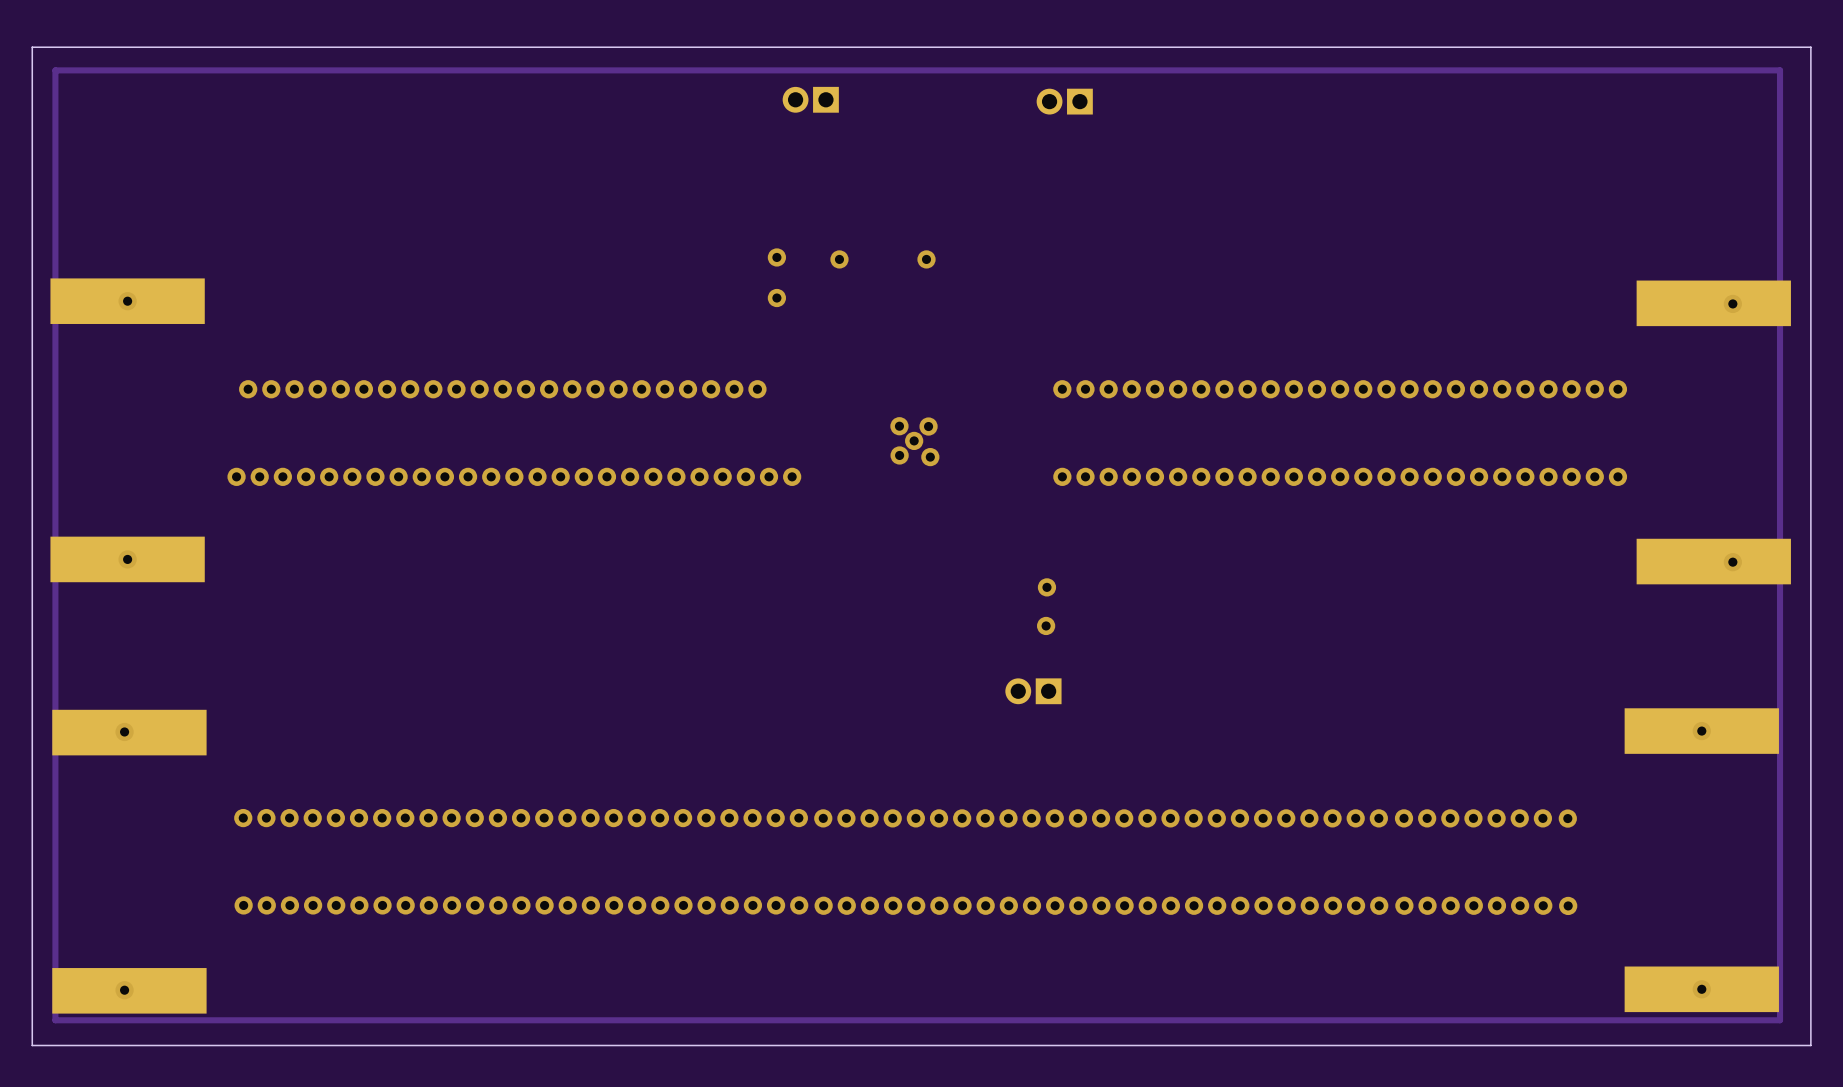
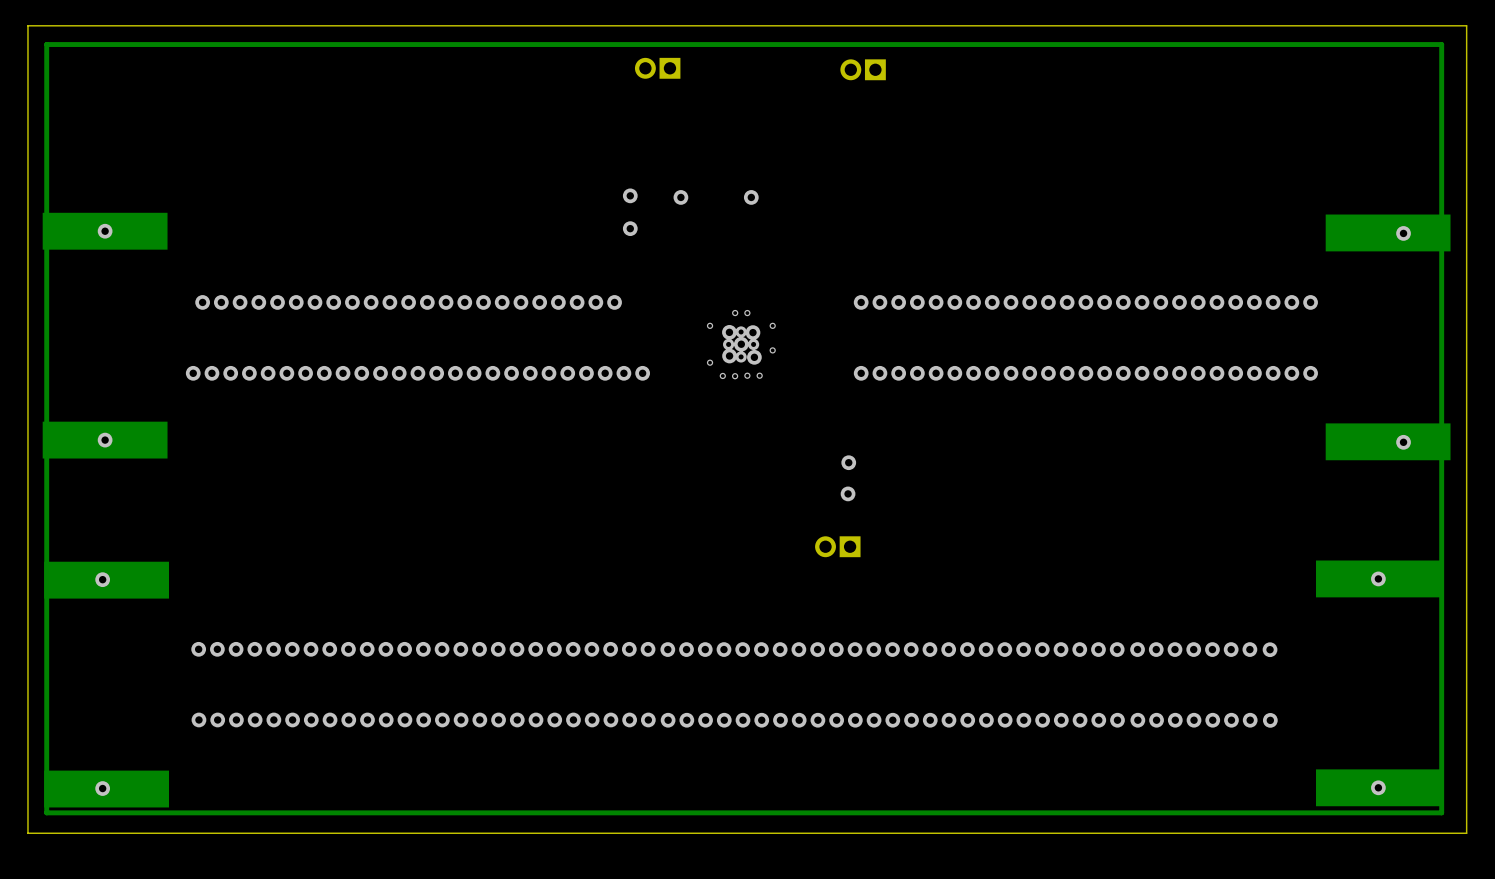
via: none -> (735, 313)
via: none -> (747, 313)
via: none -> (710, 325)
via: none -> (772, 325)
via: none -> (741, 331)
via: none -> (728, 344)
via: none -> (753, 344)
via: none -> (772, 350)
via: none -> (741, 356)
via: none -> (710, 362)
via: none -> (747, 375)
via: none -> (759, 375)
via: none -> (722, 375)
via: none -> (735, 376)

